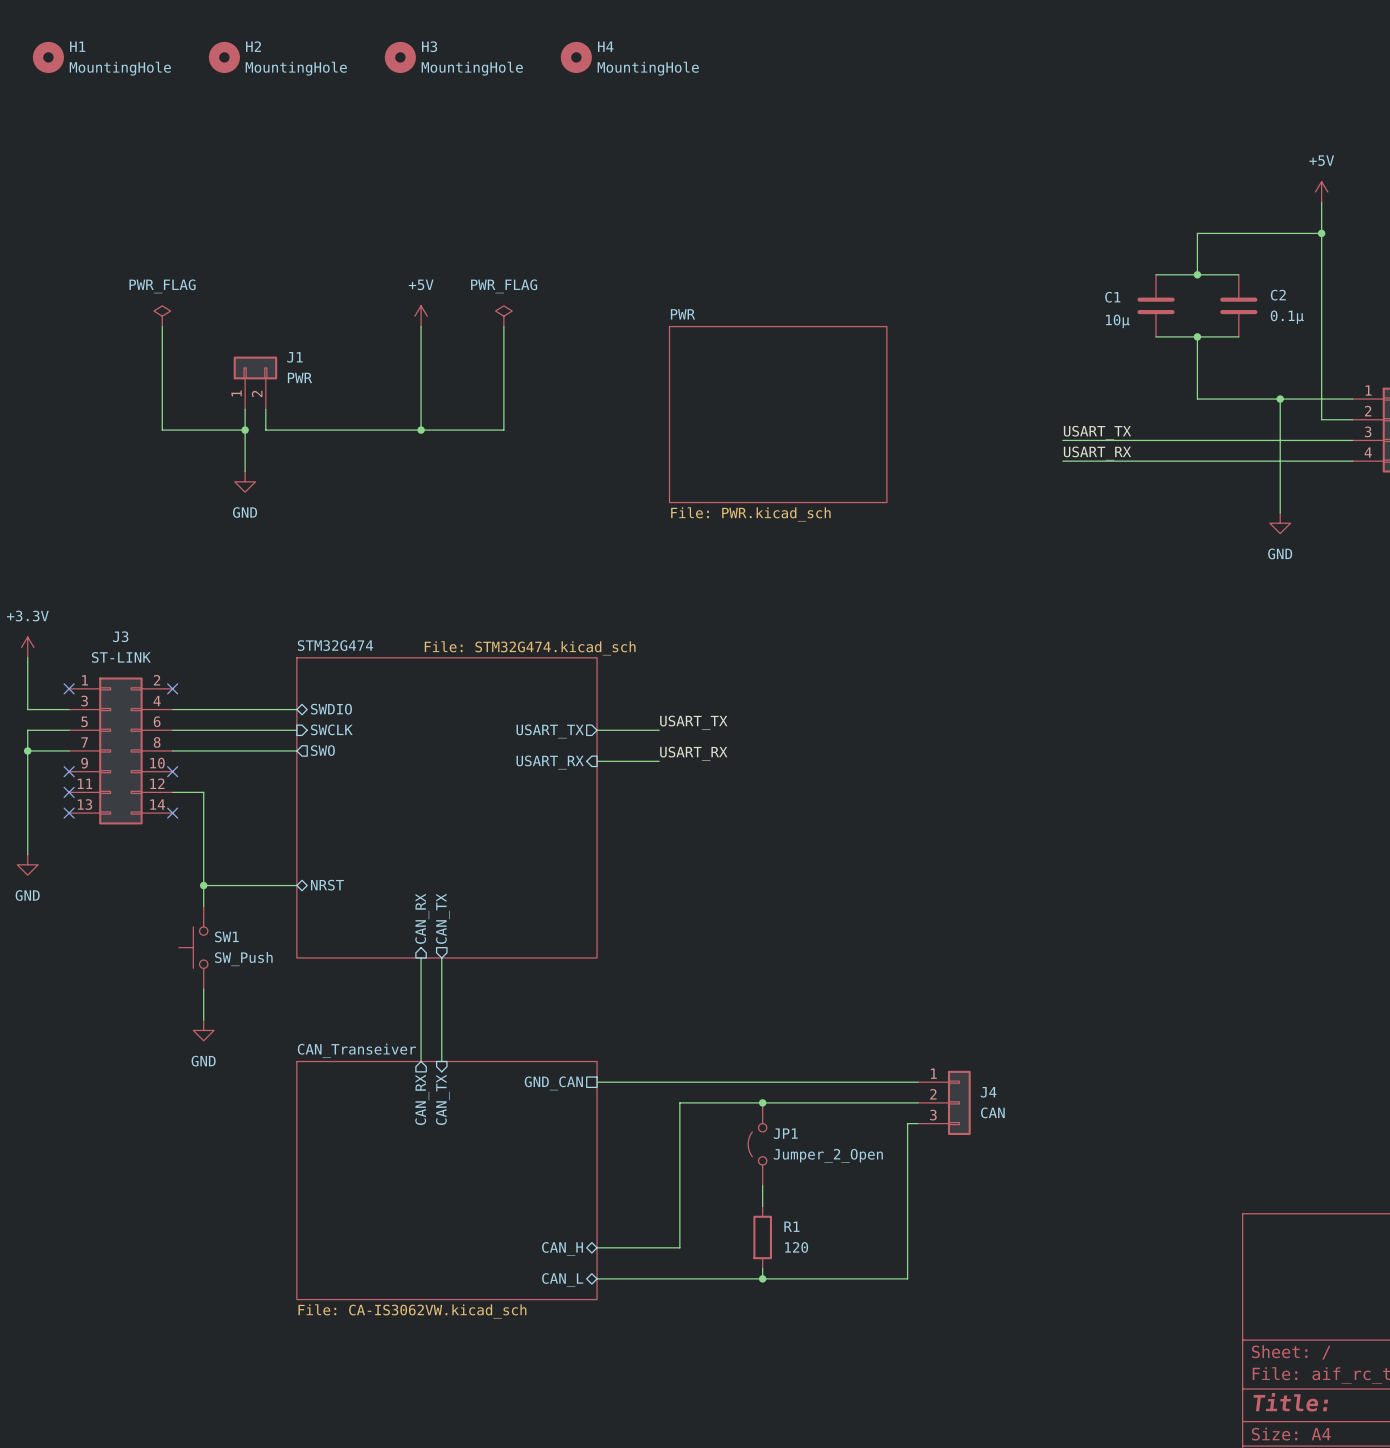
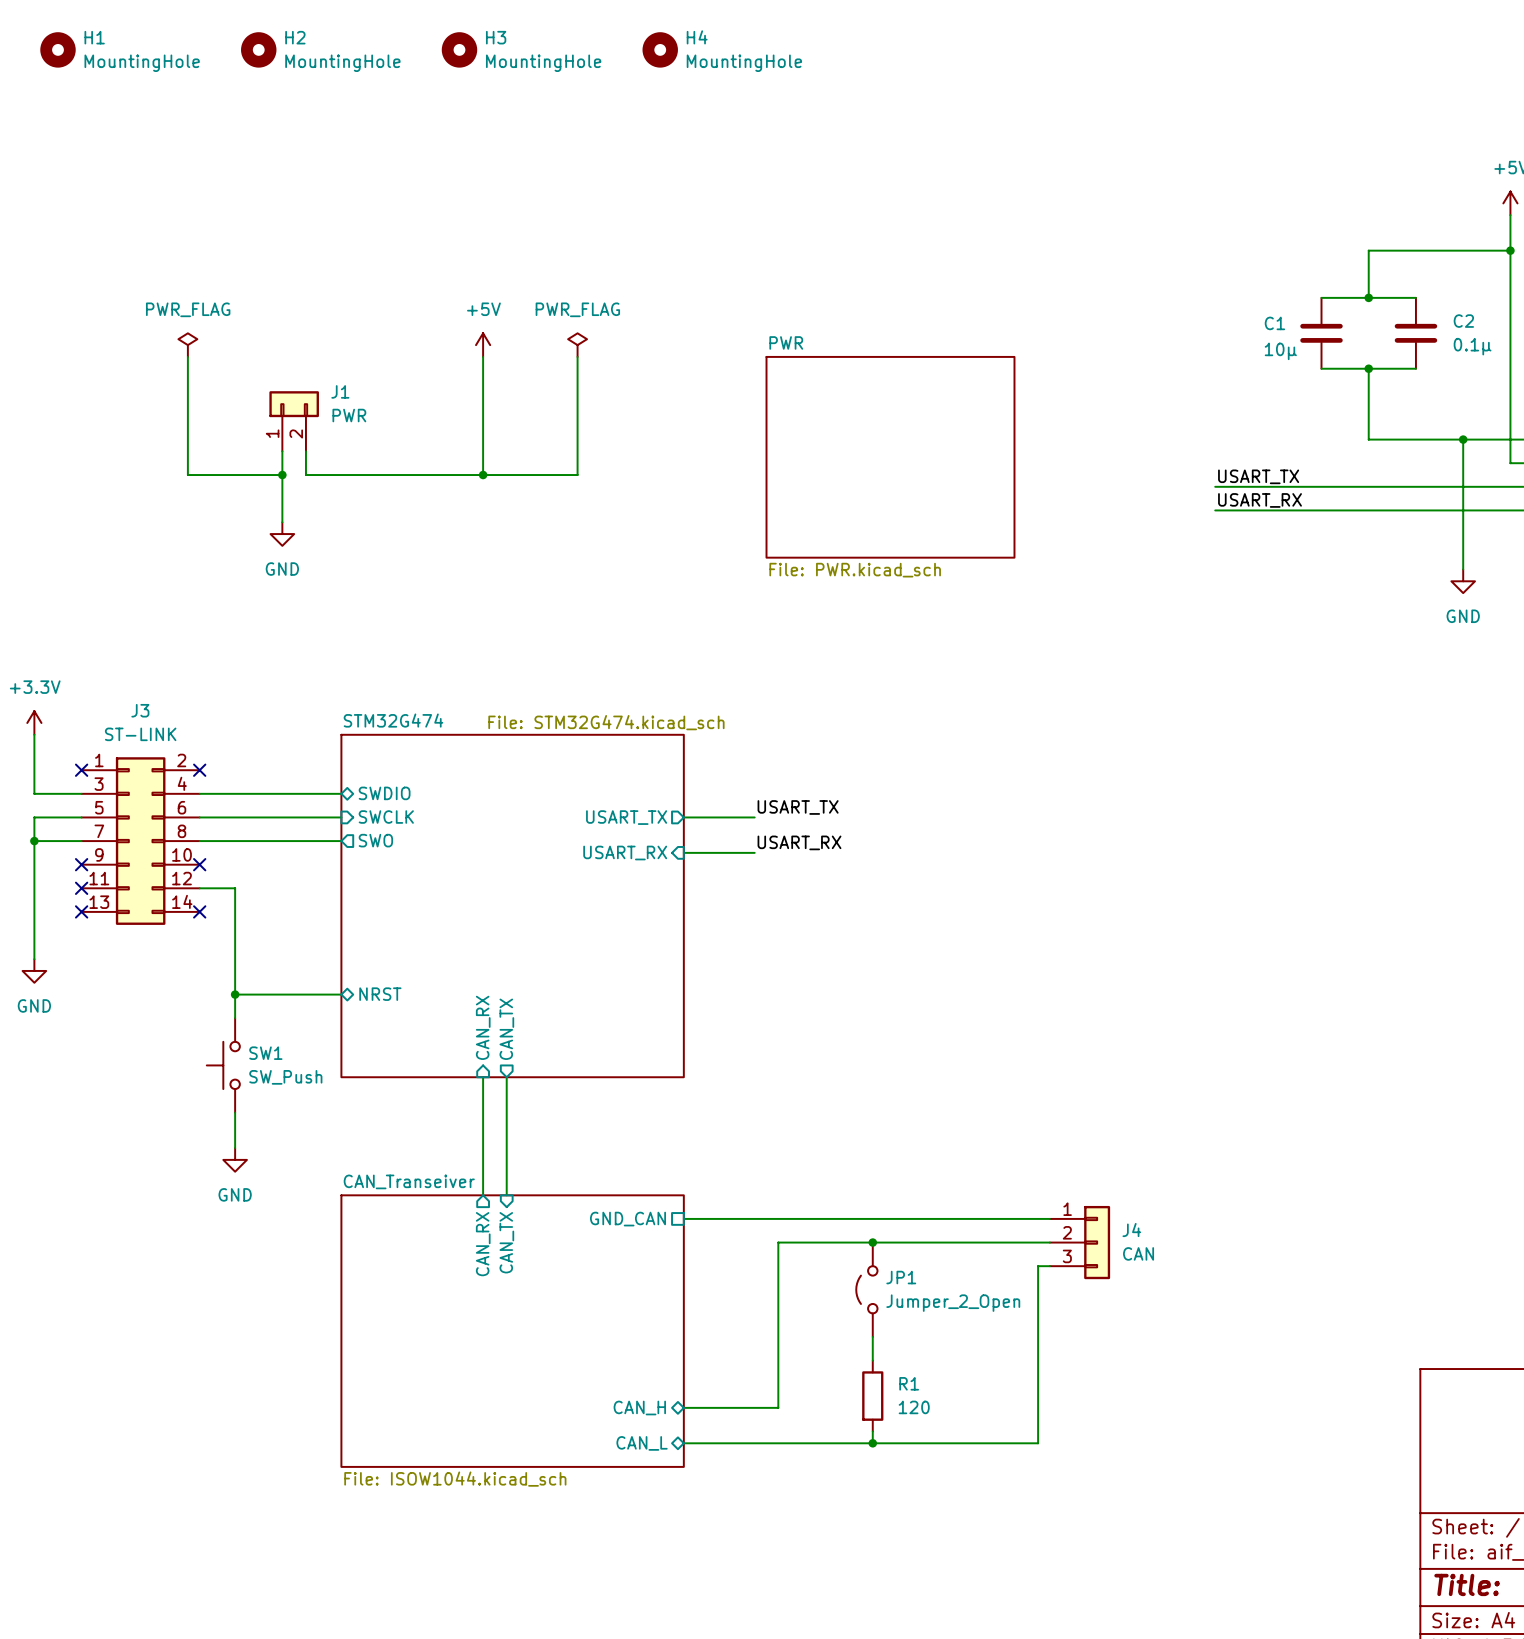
sheet CAN_Transeiver value: File: CA-IS3062VW.kicad_sch (412, 1311) -> File: ISOW1044.kicad_sch (455, 1479)

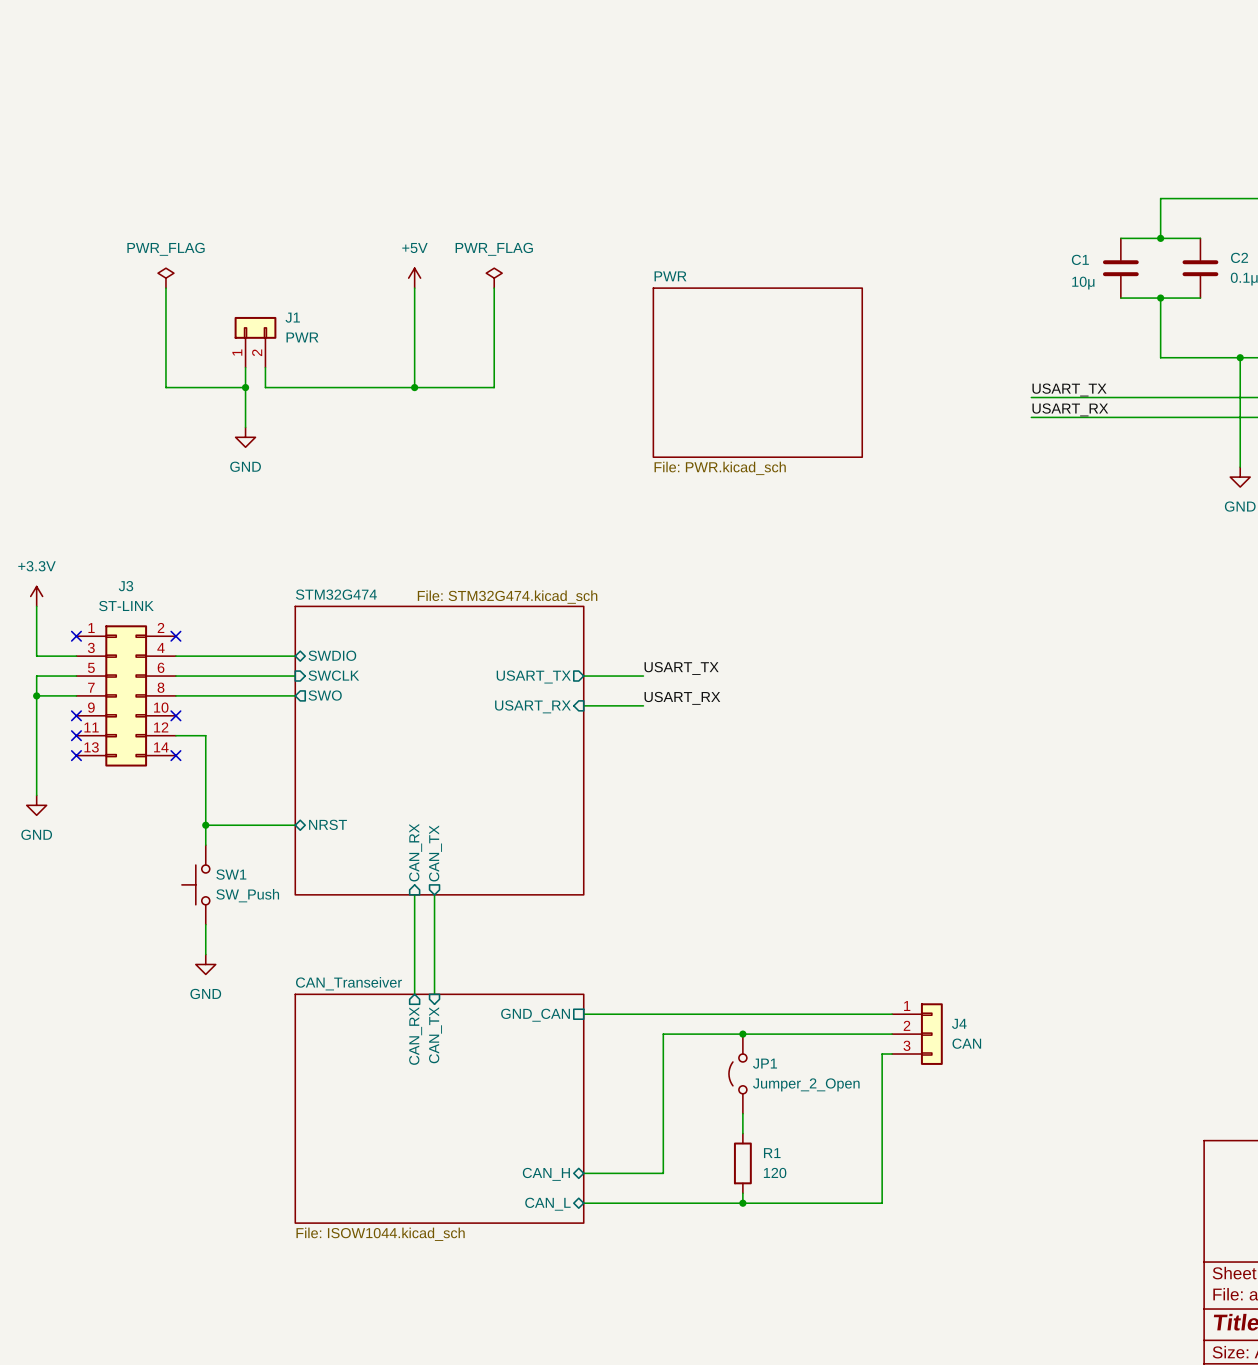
H1: MountingHole (58, 49) -> none
H2: MountingHole (258, 49) -> none
H3: MountingHole (459, 49) -> none
H4: MountingHole (660, 49) -> none

